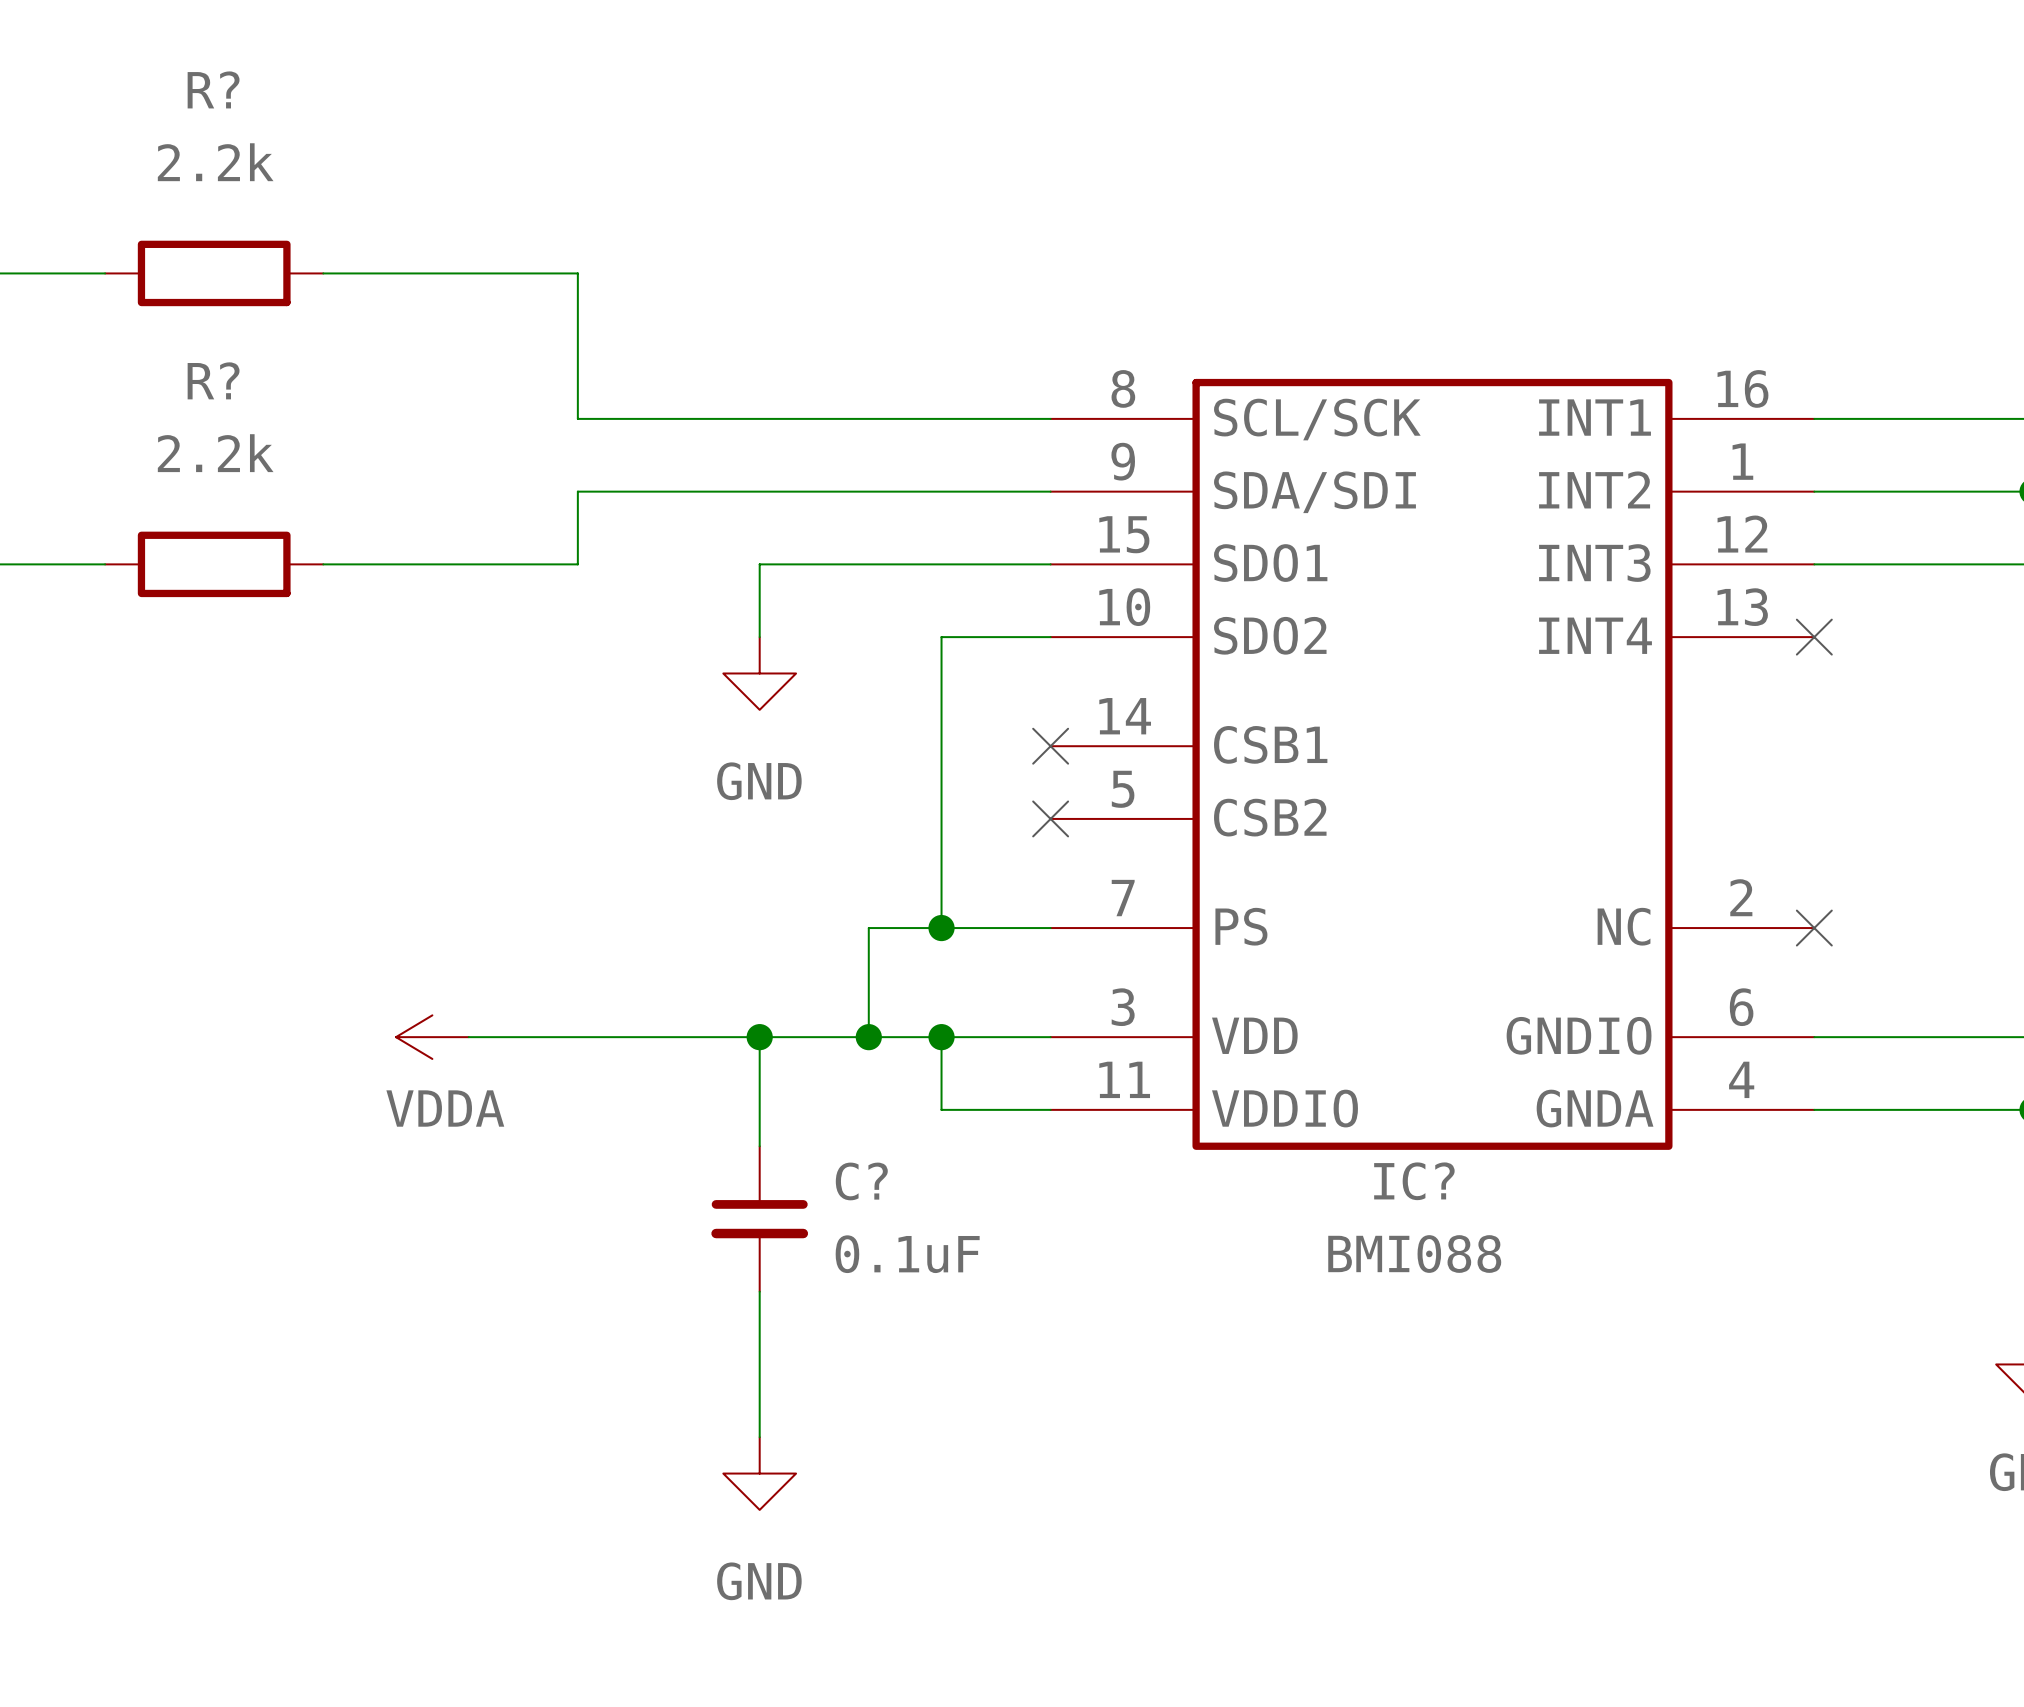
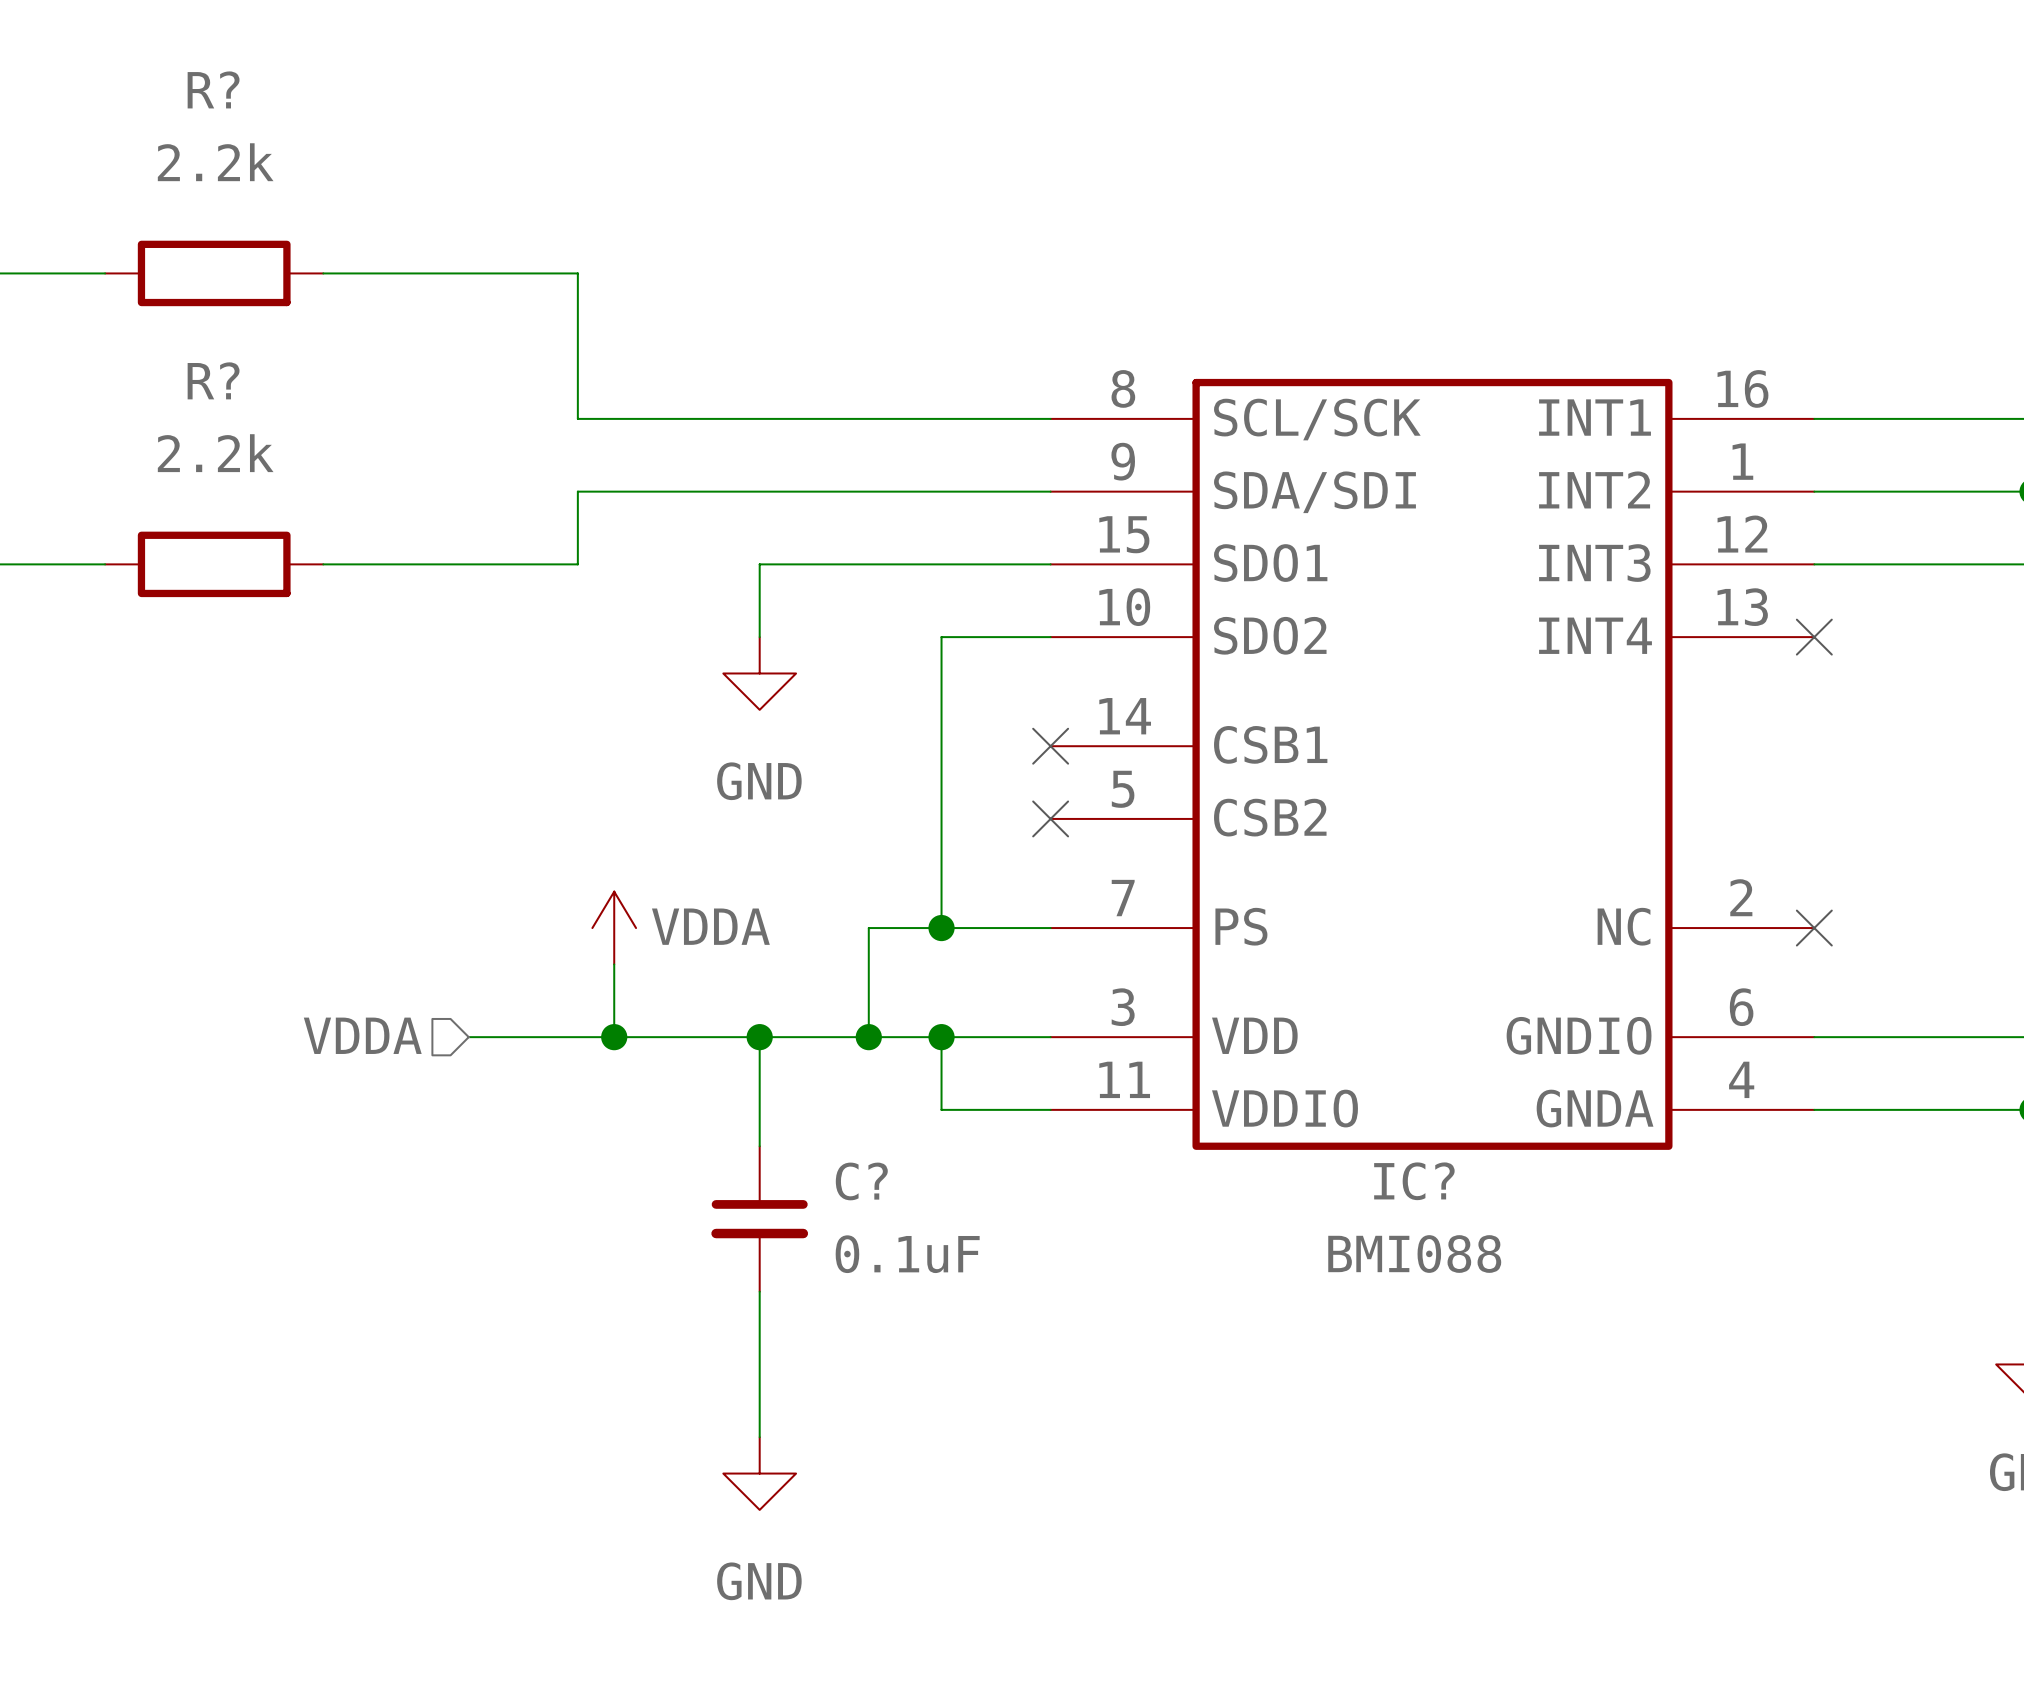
wire: none -> (614, 964) (614, 1037)
hierarchical label: none -> VDDA (362, 1035)
power symbol rotation: 0° (432, 1037) -> 90° clockwise (614, 928)
power symbol position: VDDA (432, 1037) -> VDDA (614, 928)
junction: none -> (614, 1037)
power symbol text position: VDDA (445, 1108) -> VDDA (710, 926)

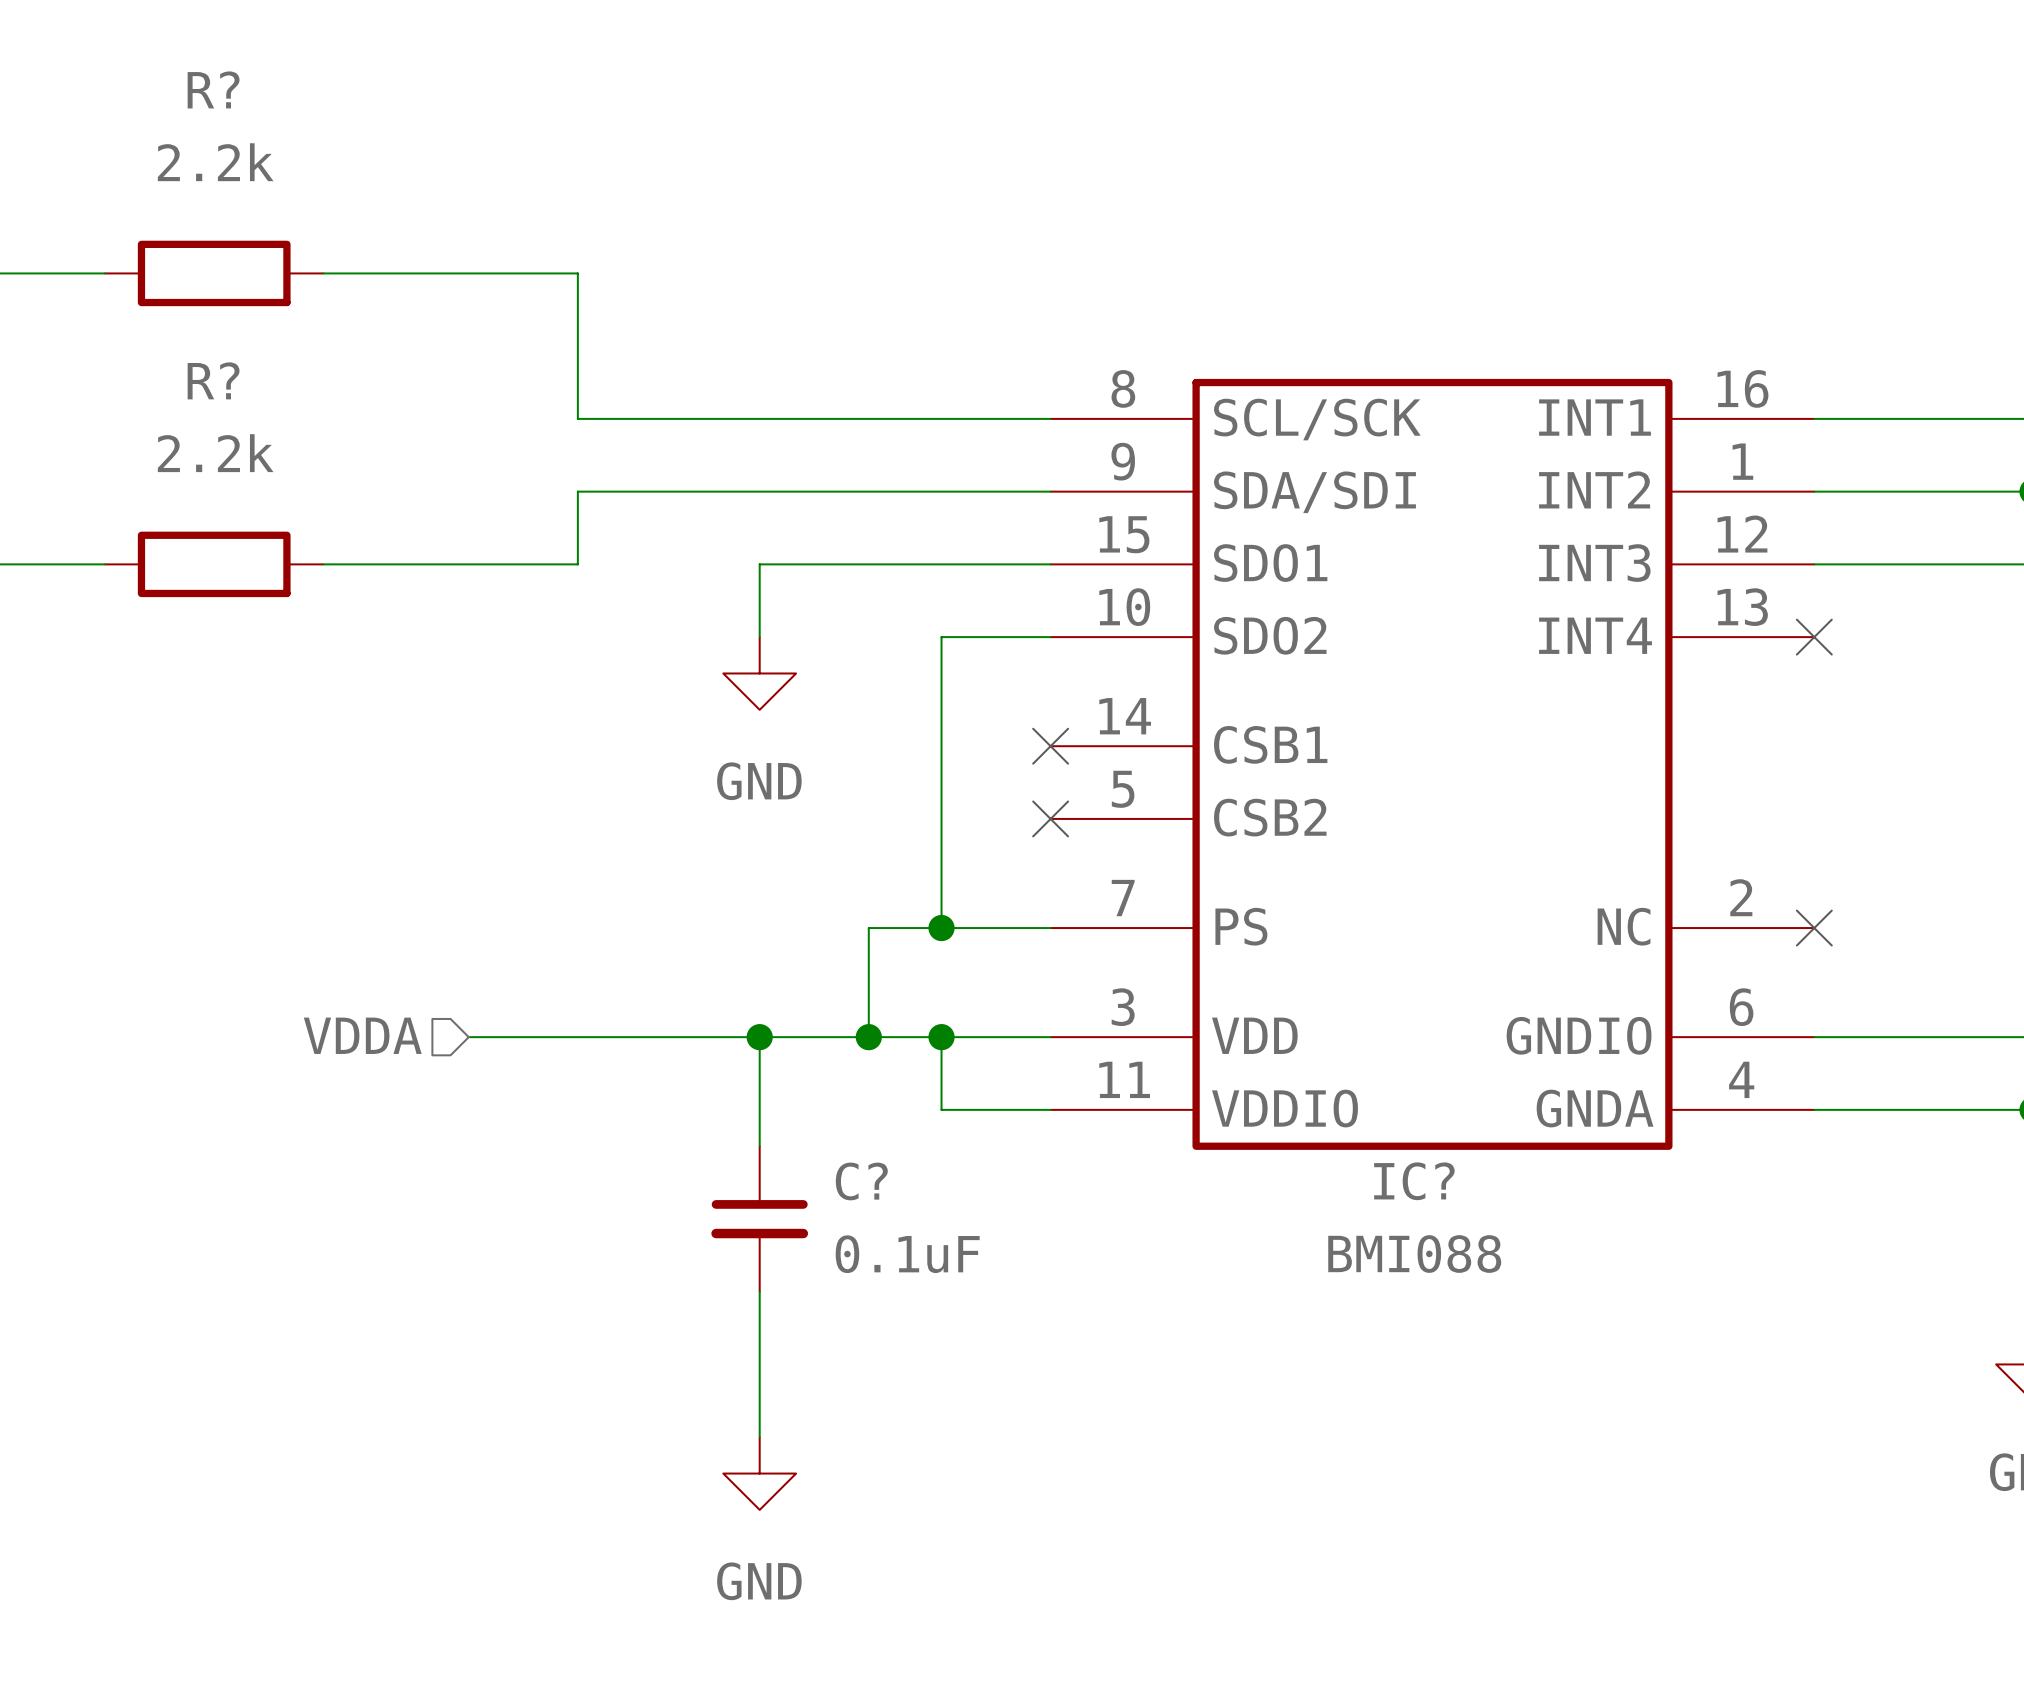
power symbol: VDDA (614, 928) -> none
wire: (614, 964) (614, 1037) -> none
junction: (614, 1037) -> none

